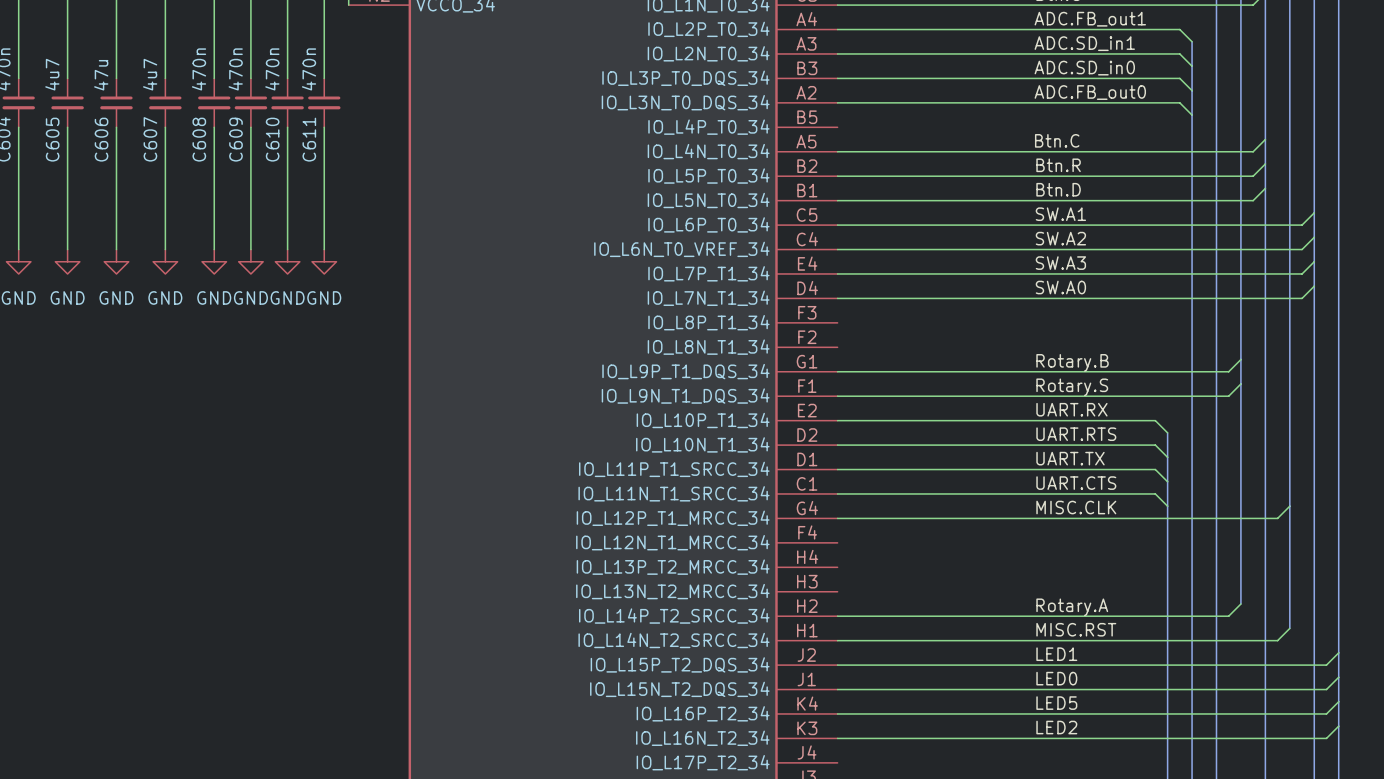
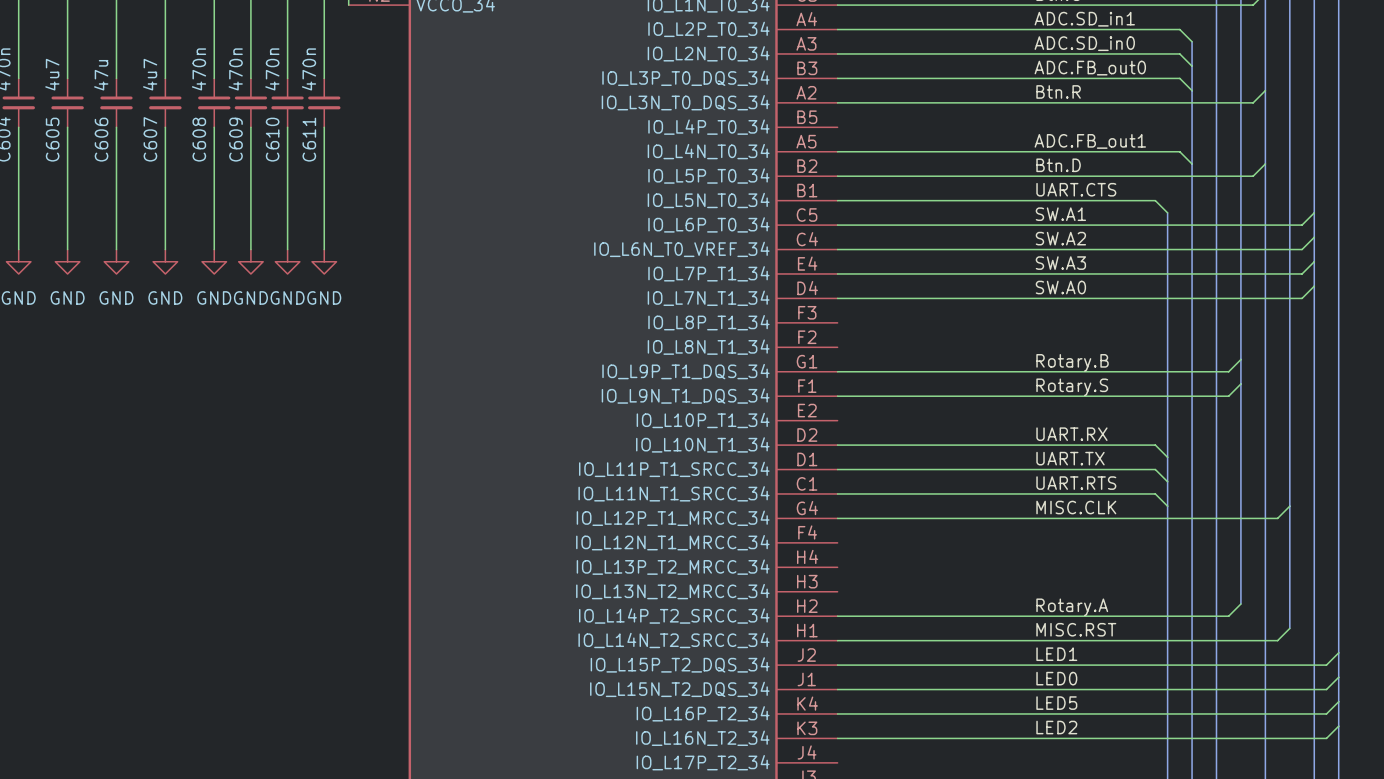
label: ADC.FB_out1 (1090, 19) -> ADC.SD_in1 (1084, 19)
label: ADC.SD_in1 (1084, 43) -> ADC.SD_in0 (1084, 43)
label: ADC.SD_in0 (1084, 68) -> ADC.FB_out0 (1090, 68)
label: ADC.FB_out0 (1090, 92) -> Btn.R (1058, 91)
wire: (1179, 102) (1192, 115) -> (1179, 102) (1253, 102) (1265, 90)
wire: (1265, 139) (1253, 151) (1179, 151) -> (1192, 163) (1179, 151)
label: Btn.C (1057, 140) -> none
label: none -> ADC.FB_out1 (1090, 141)
label: Btn.R (1058, 165) -> Btn.D (1058, 165)
wire: (1265, 188) (1253, 200) (1155, 200) -> (1167, 212) (1155, 200)
label: Btn.D (1058, 189) -> UART.CTS (1076, 189)
bus: none -> (1167, 212) (1167, 432)
label: UART.RX (1071, 409) -> none
wire: (837, 420) (1155, 420) (1167, 432) -> none
label: UART.RTS (1076, 434) -> UART.RX (1071, 434)
label: UART.CTS (1076, 483) -> UART.RTS (1076, 483)

